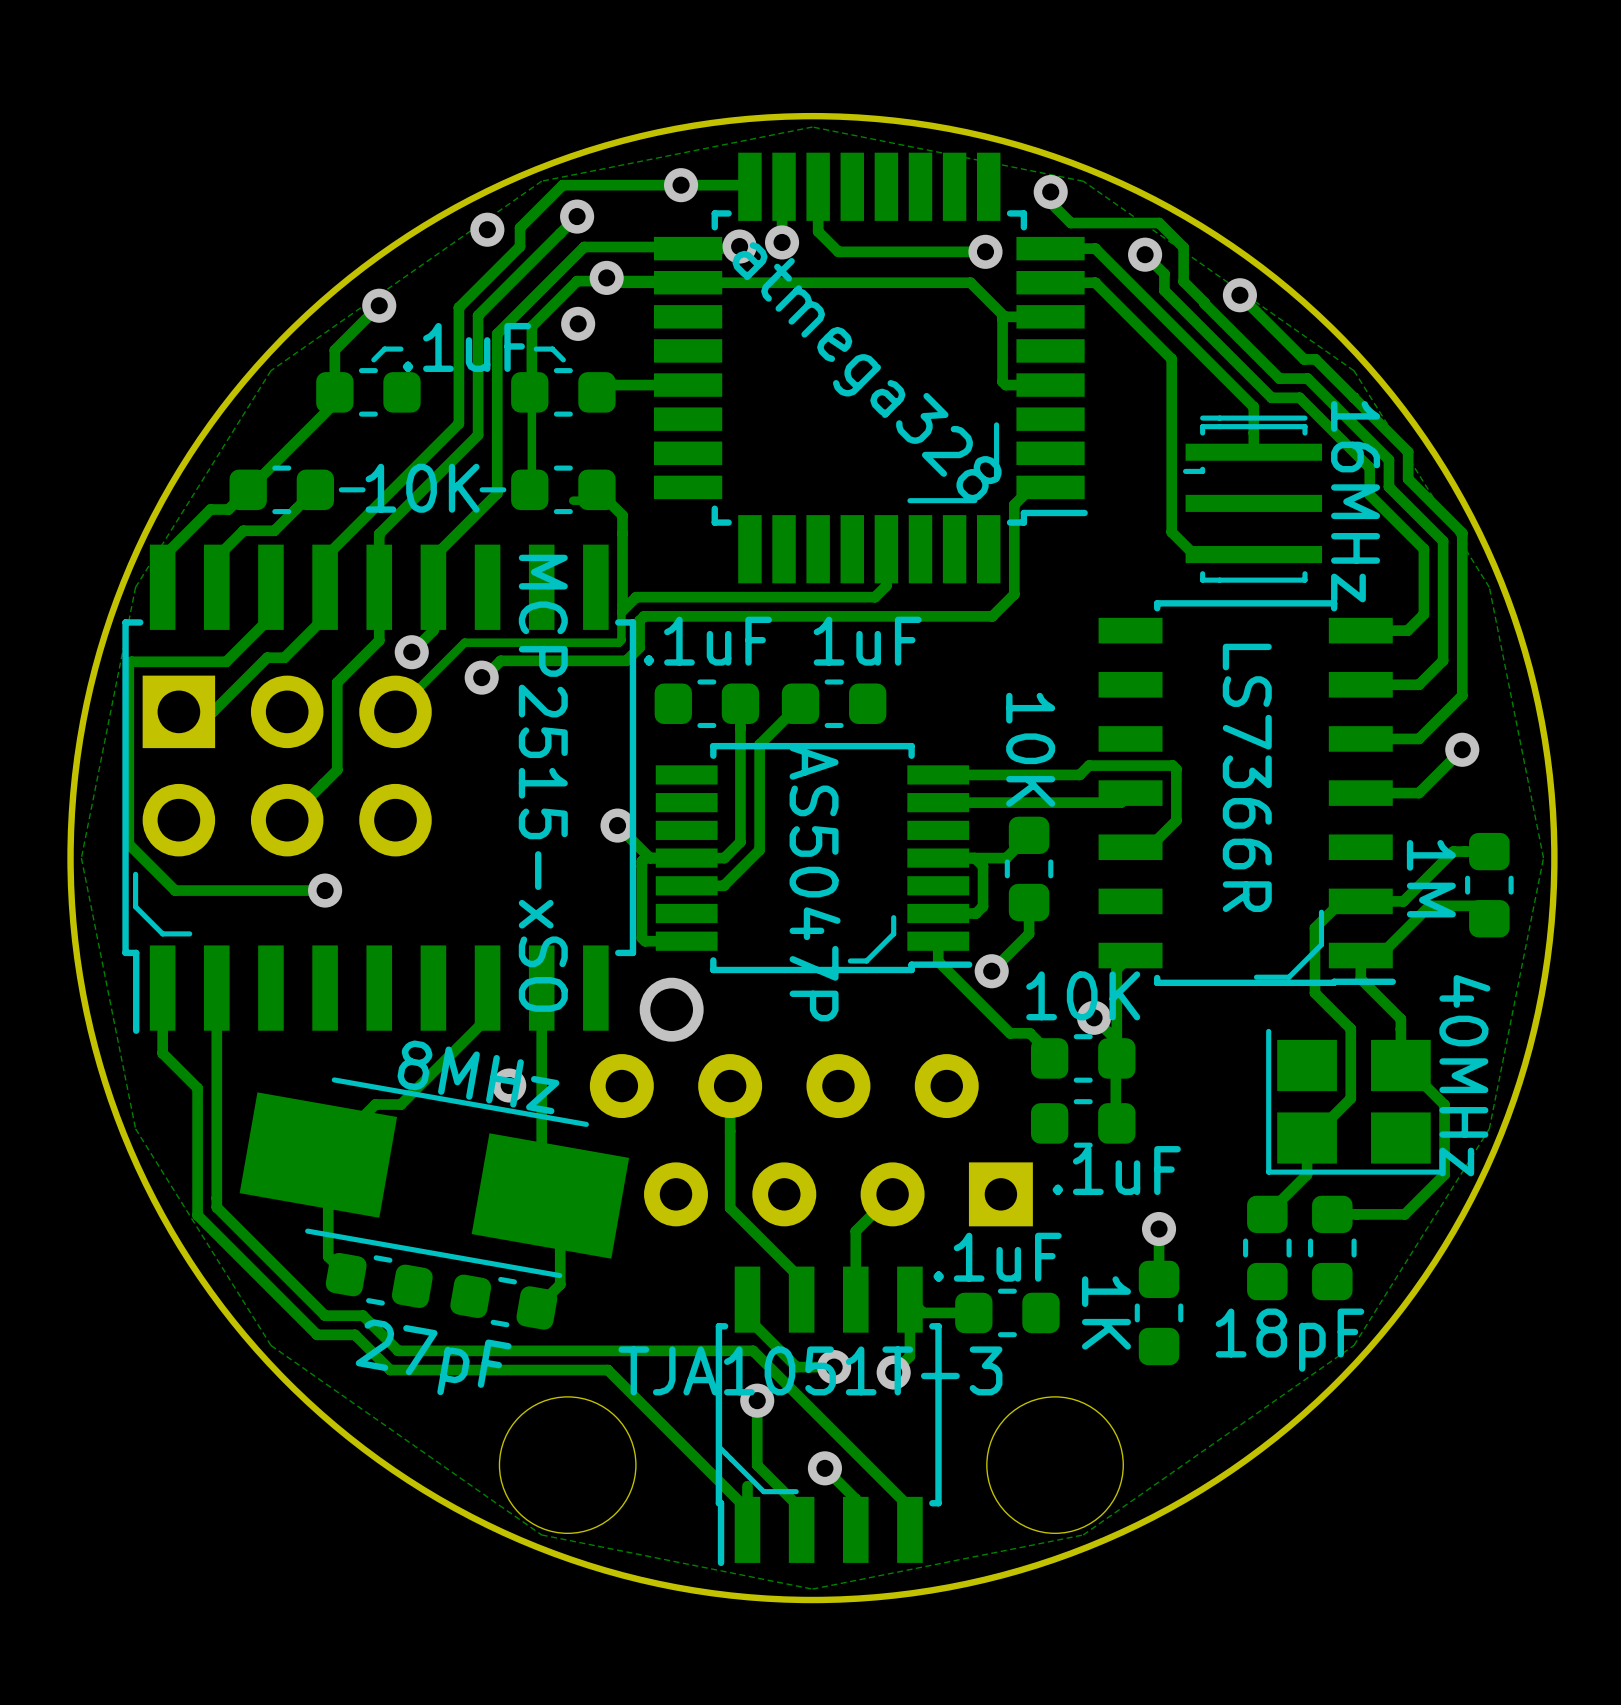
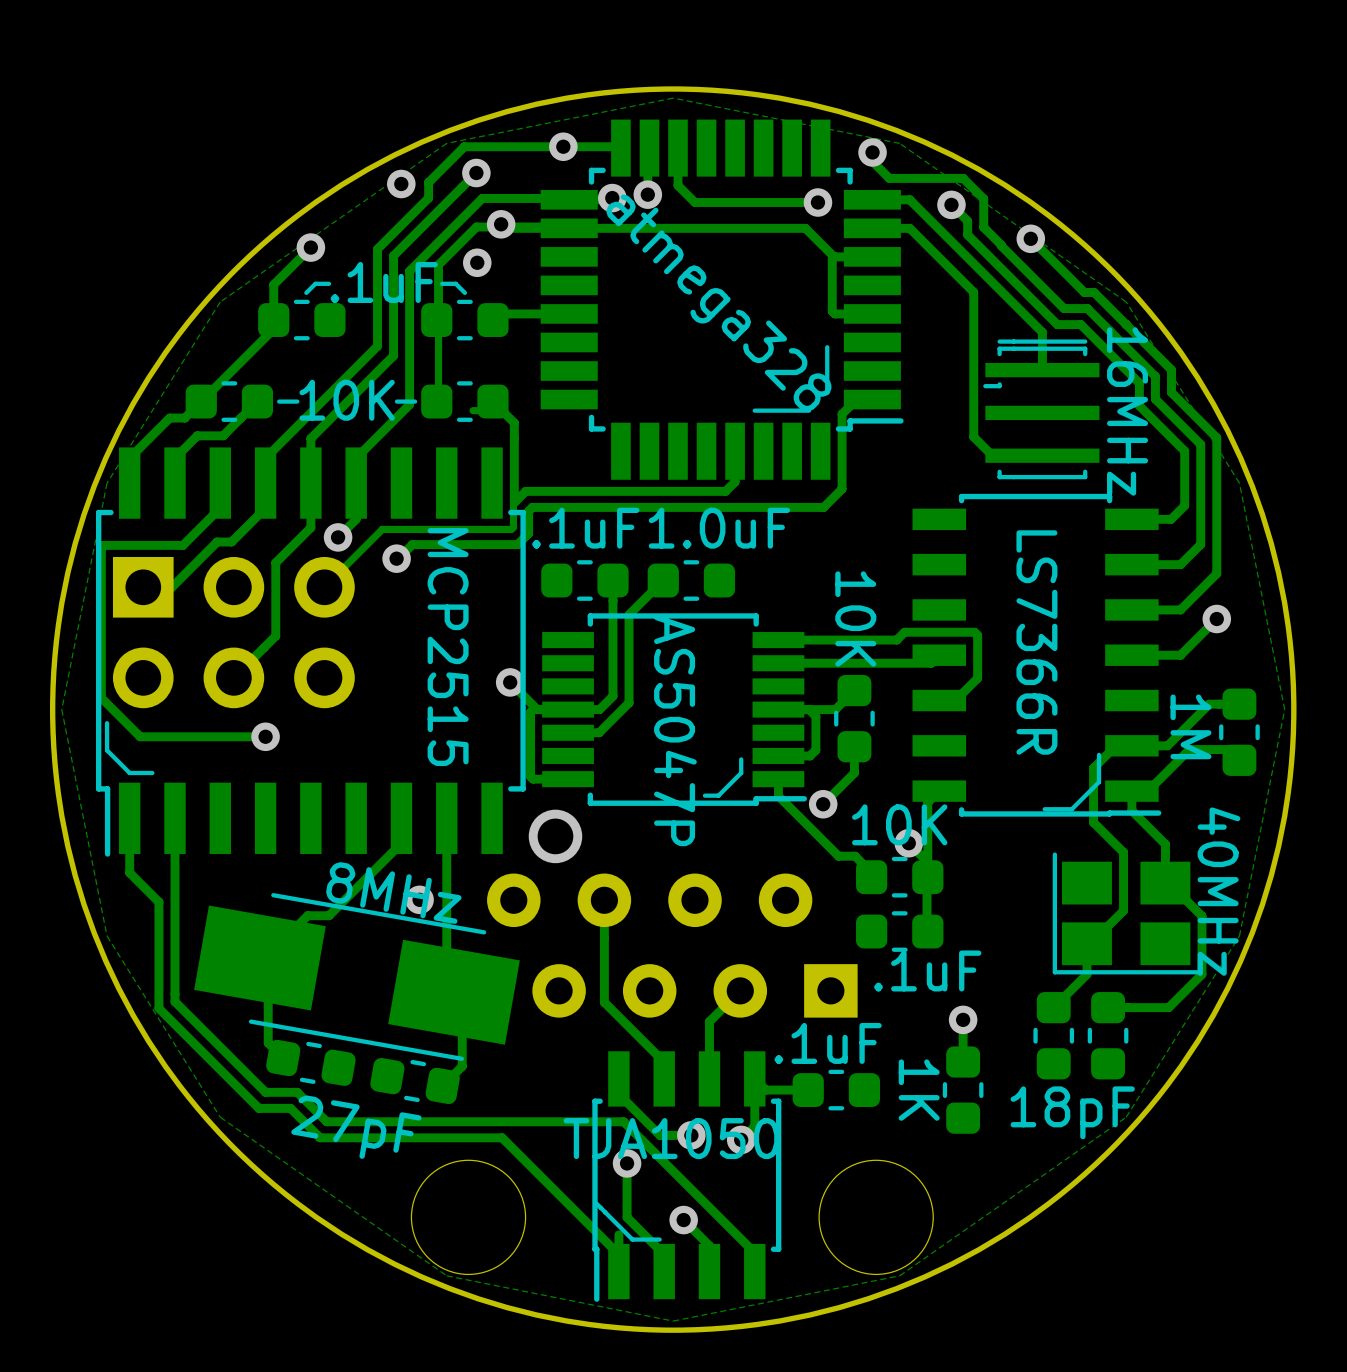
part value: 1uF (867, 641) -> 1.0uF (719, 528)
part value: MCP2515-xSO (543, 783) -> MCP2515 (448, 647)
part value: TJA1051T-3 (810, 1370) -> TJA1050 (671, 1138)

